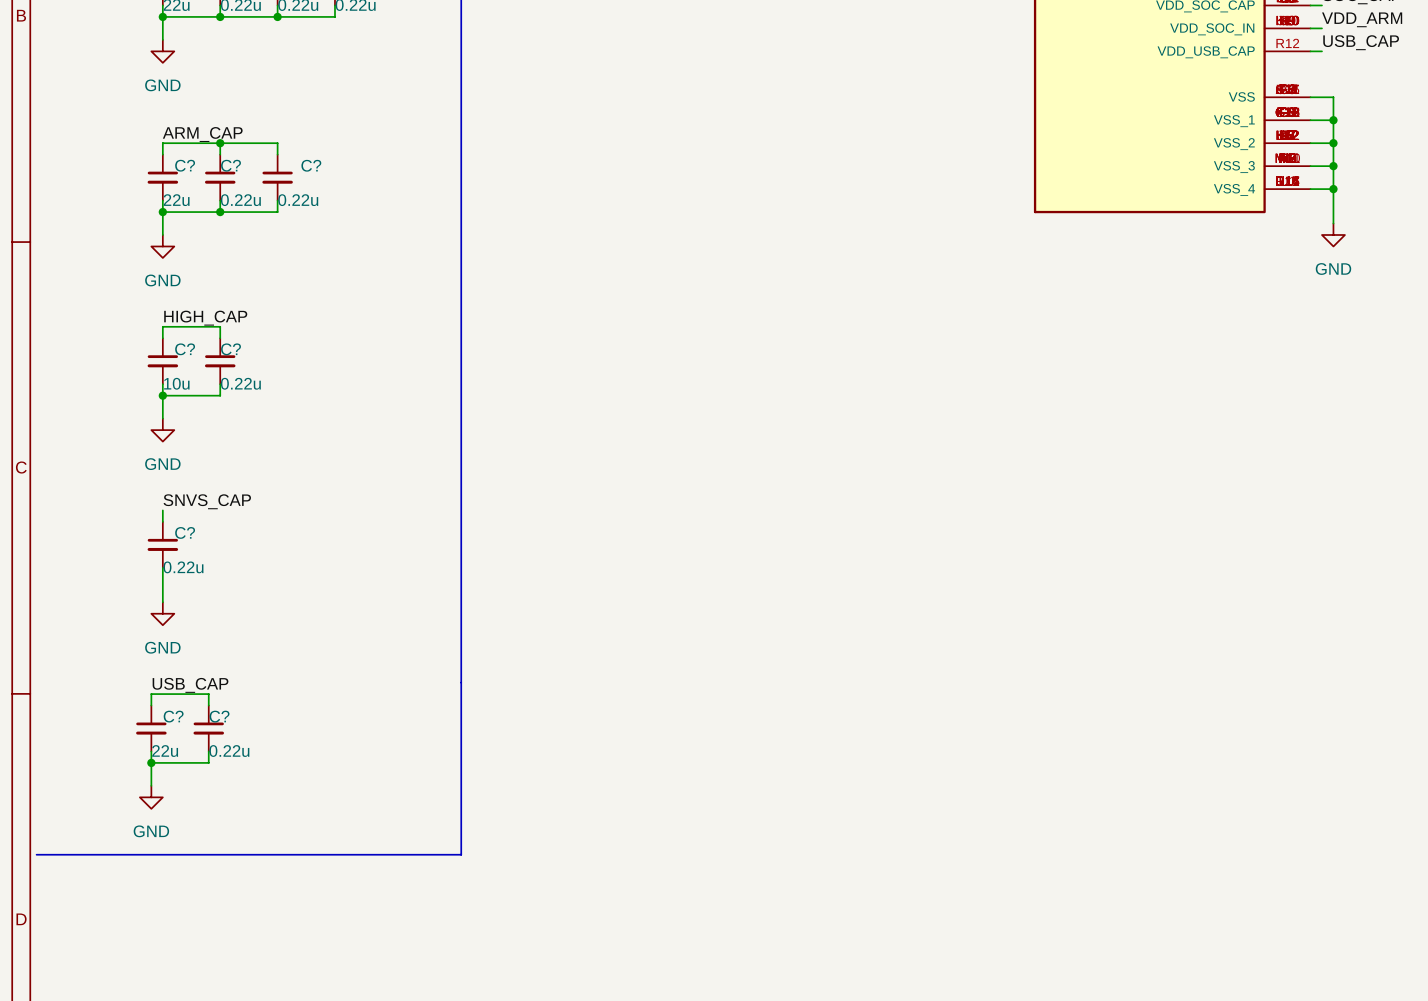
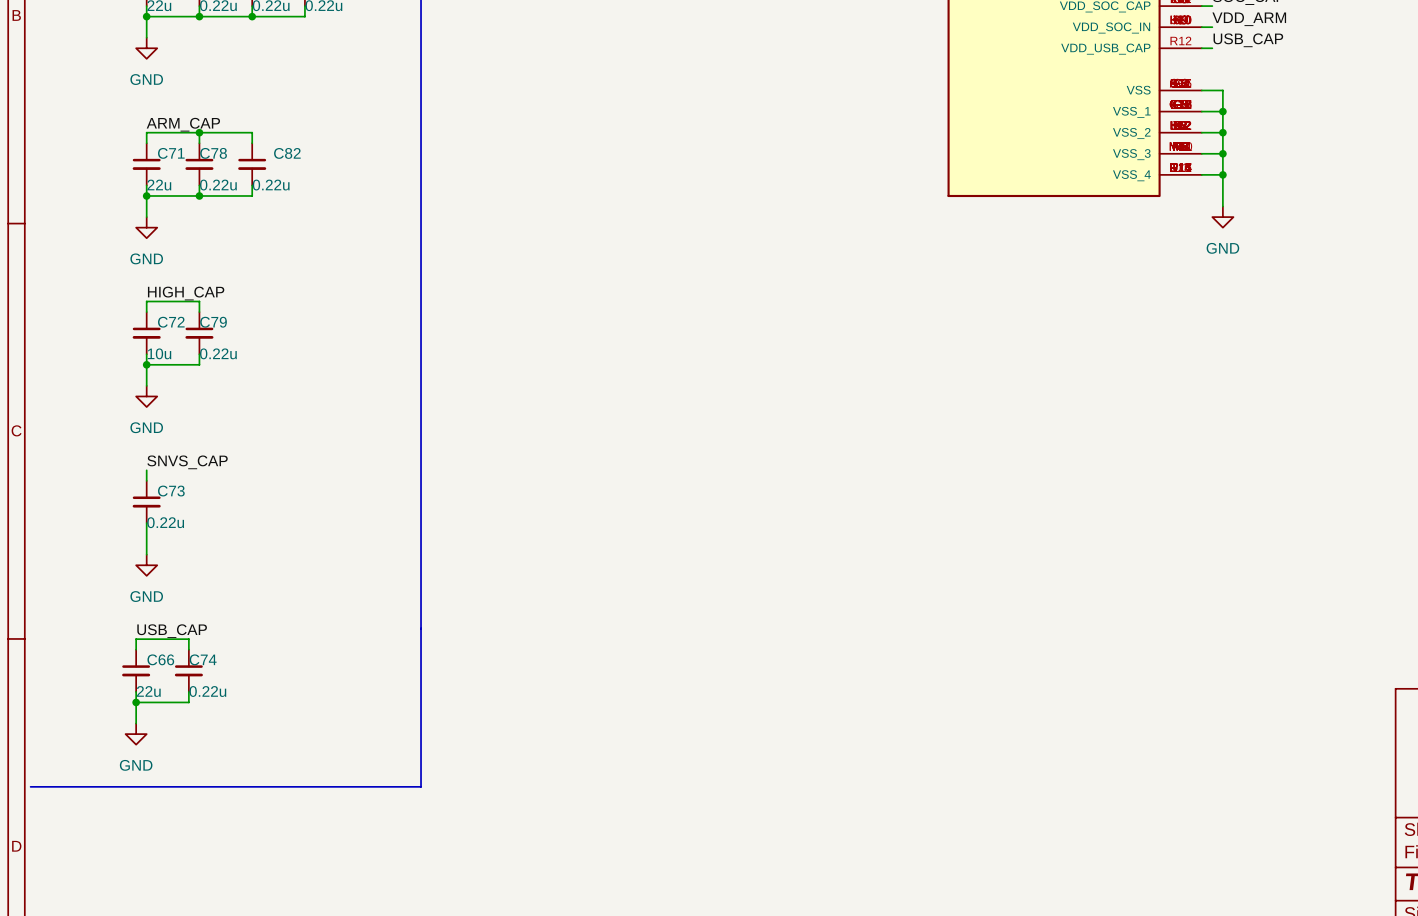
C? name: C? (185, 165) -> C71 (171, 153)
C? name: C? (231, 165) -> C78 (213, 153)
C? name: C? (311, 165) -> C82 (287, 153)
C? name: C? (185, 349) -> C72 (171, 322)
C? name: C? (231, 349) -> C79 (213, 322)
C? name: C? (185, 532) -> C73 (171, 491)
C? name: C? (173, 716) -> C66 (160, 659)
C? name: C? (219, 716) -> C74 (203, 659)

